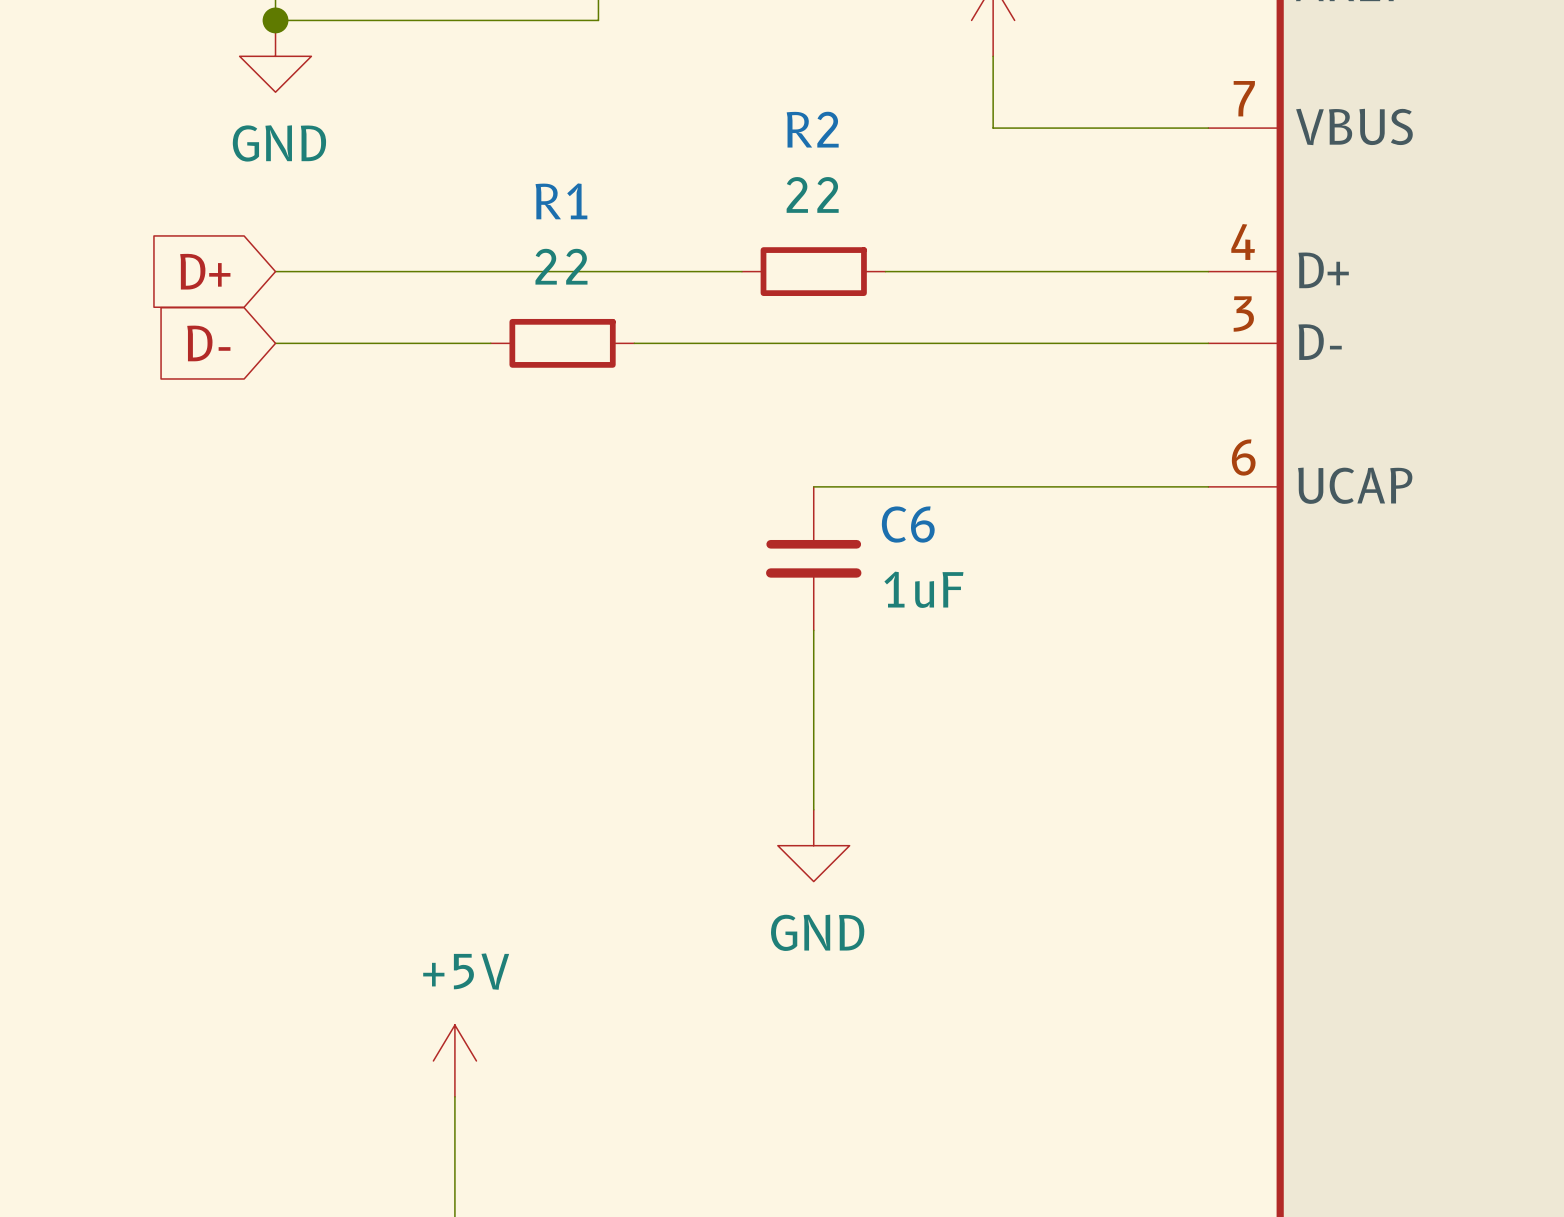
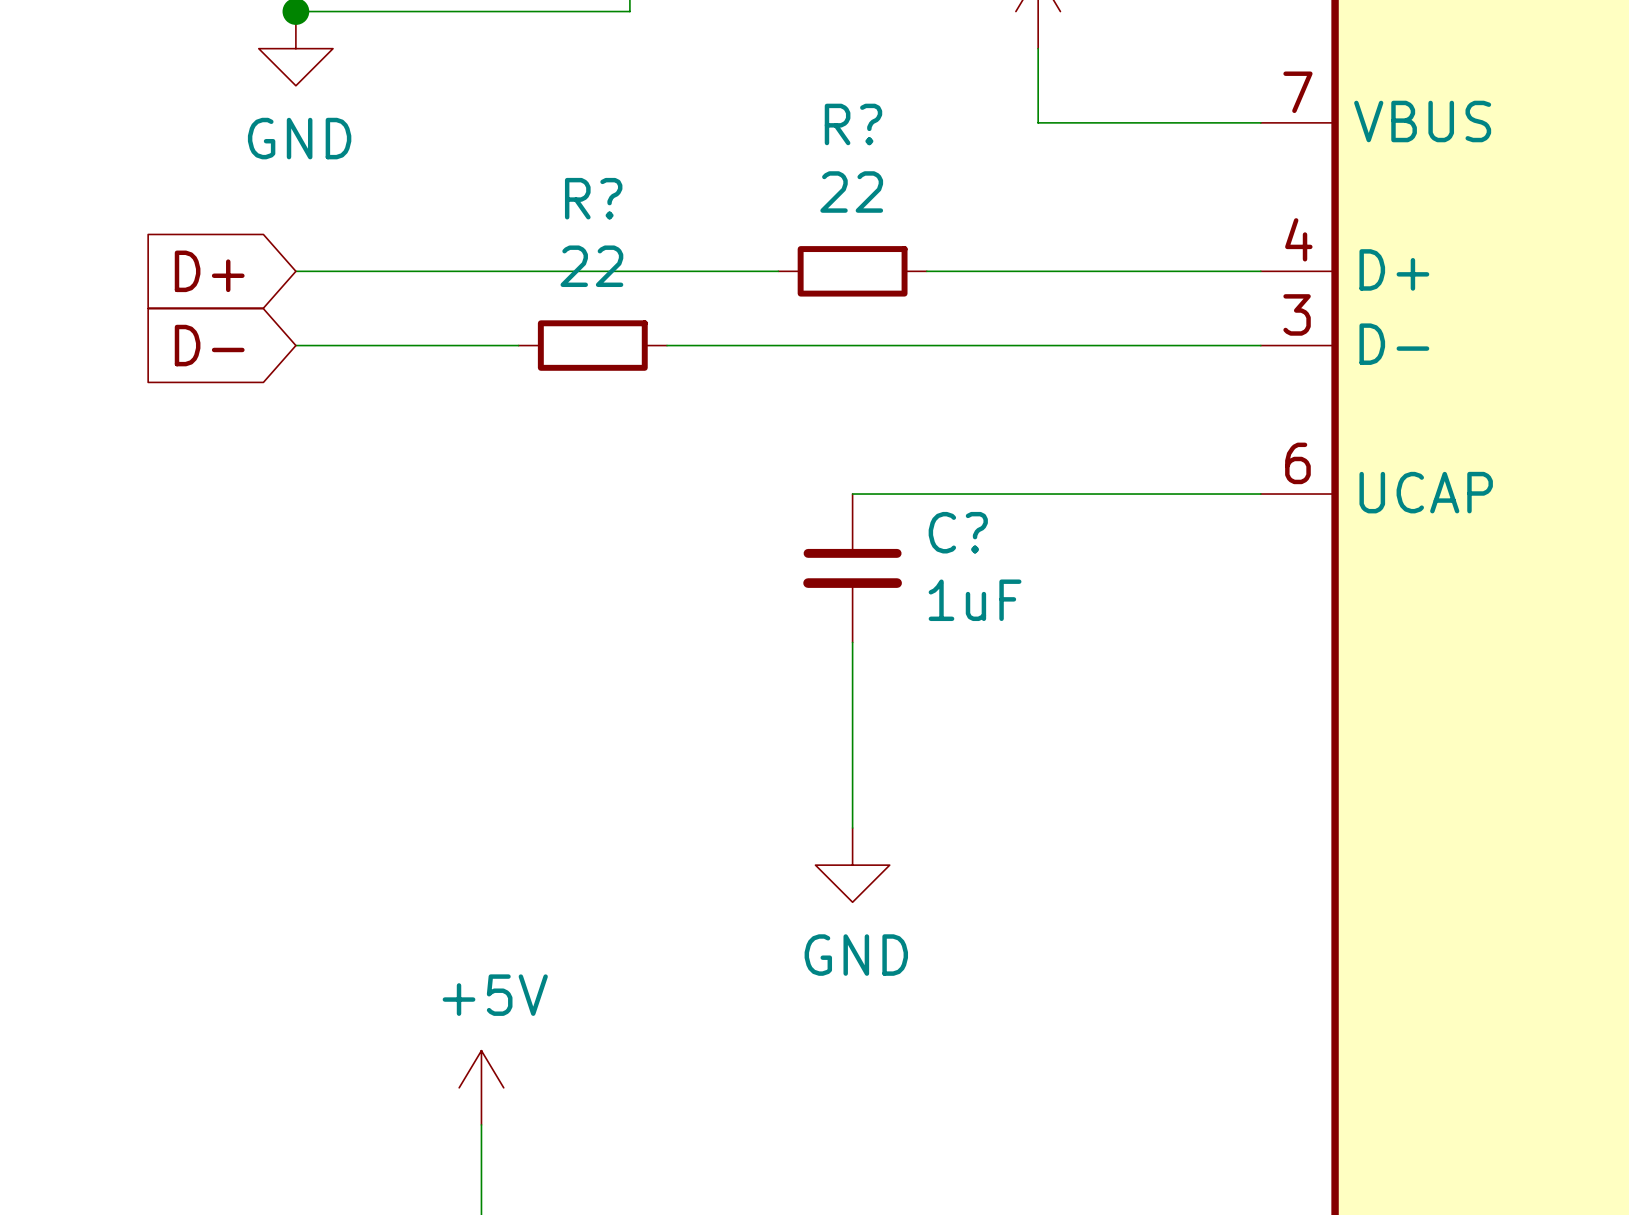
R2 name: R2 (812, 129) -> R? (853, 124)
R1 name: R1 (561, 201) -> R? (593, 198)
C6 name: C6 (908, 524) -> C? (958, 532)

